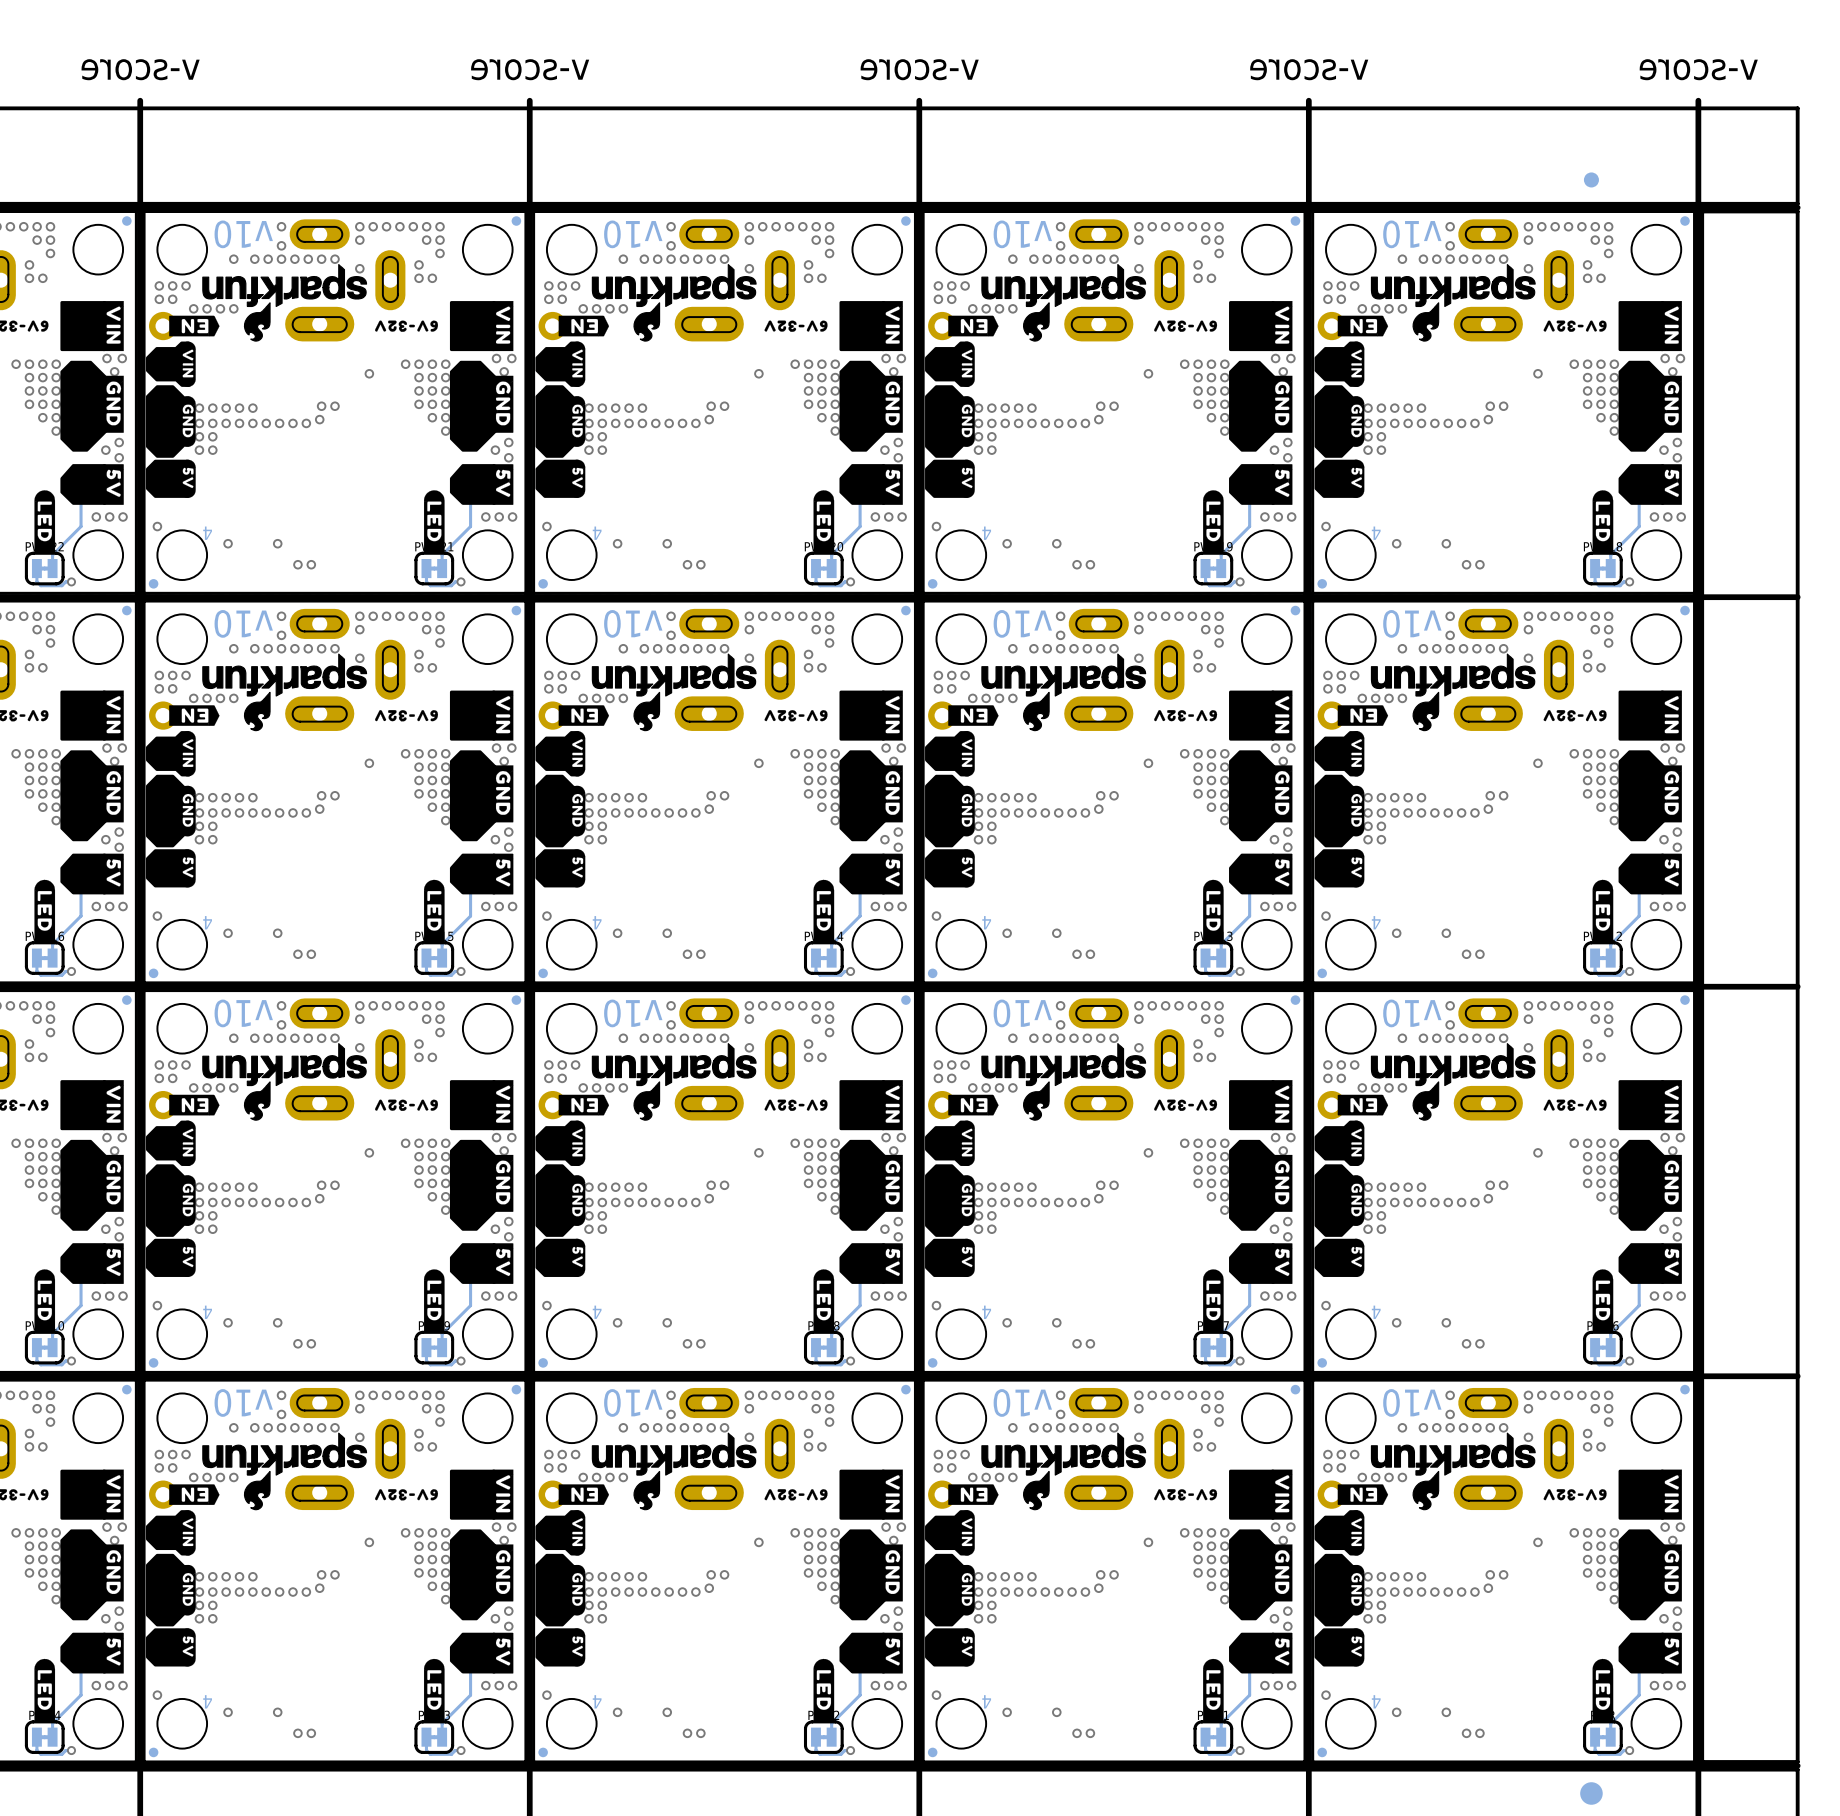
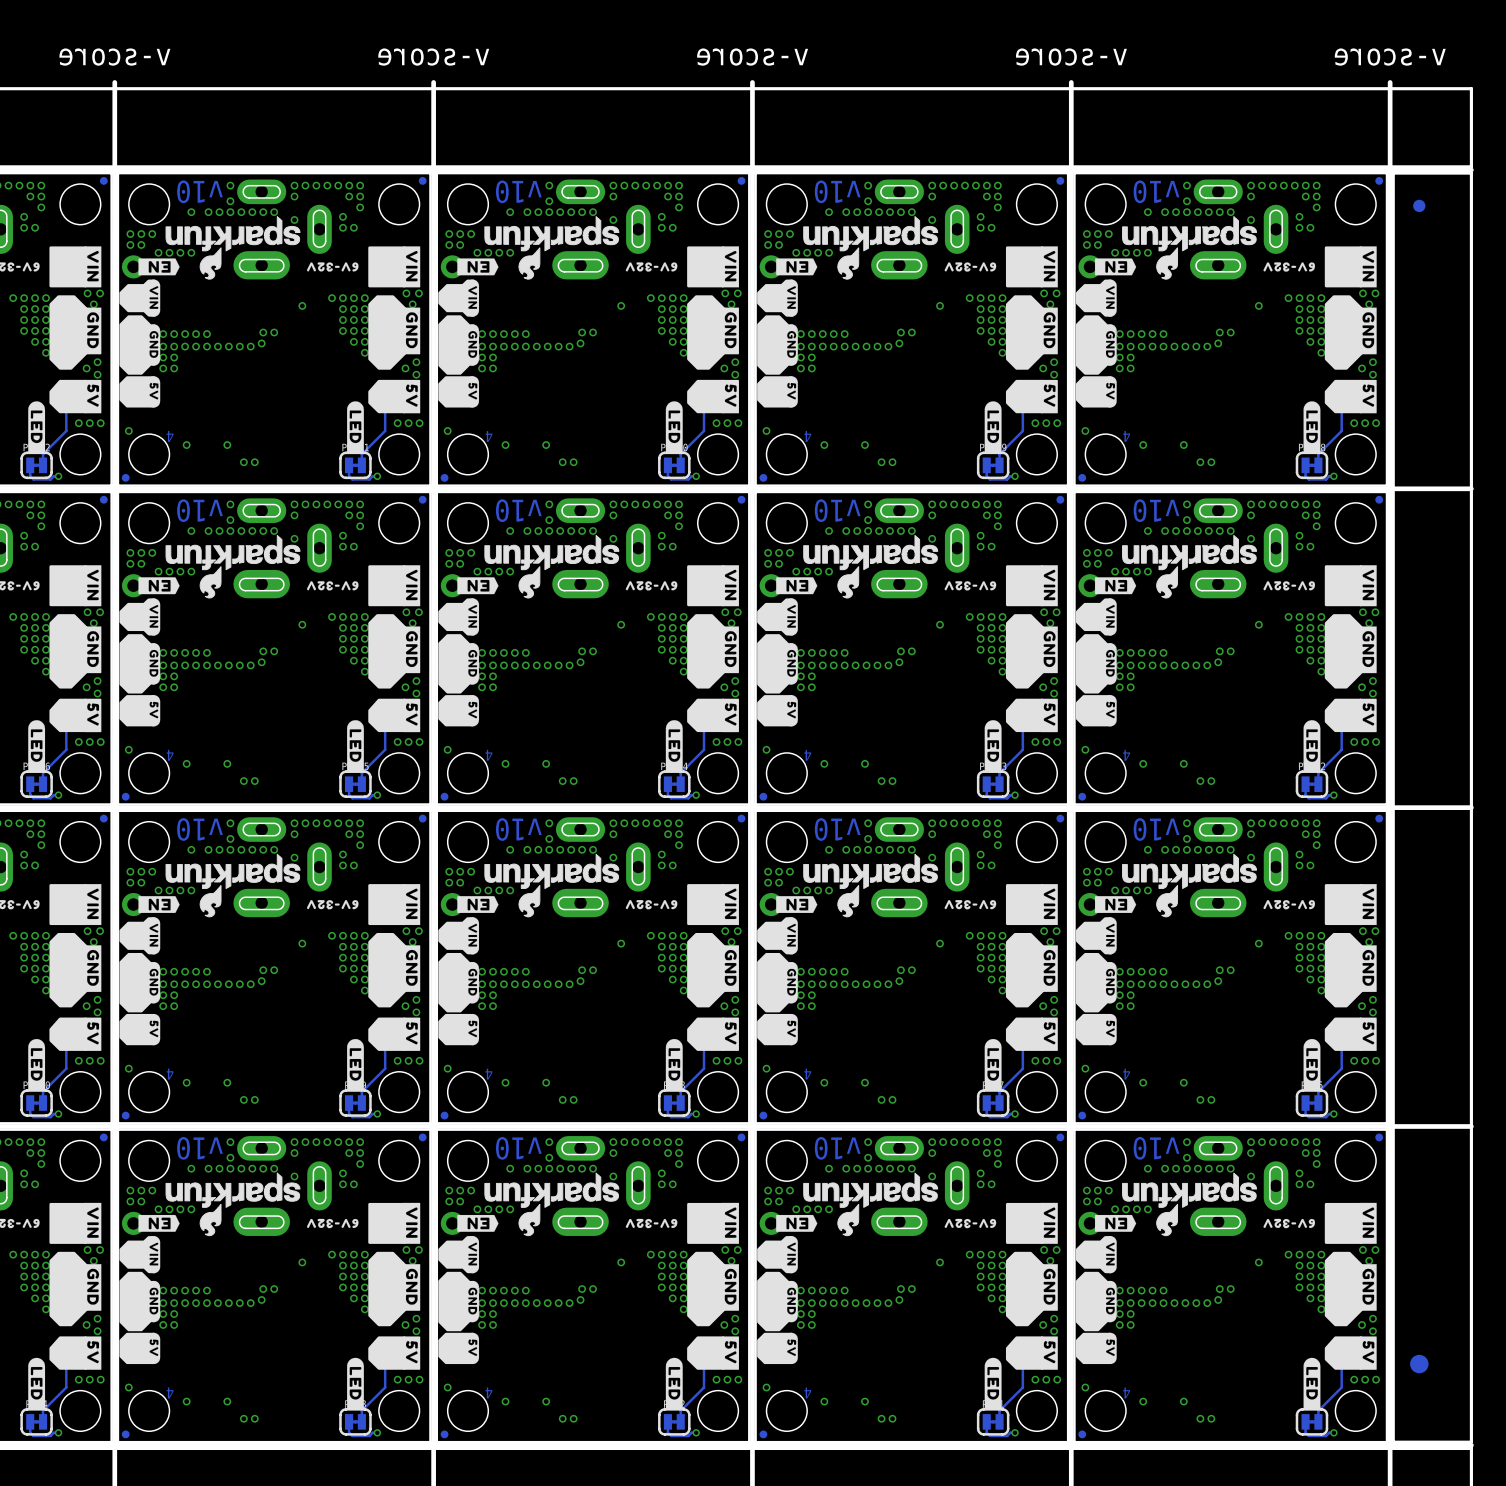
part position: (1591, 179) -> (1419, 205)
part position: (1591, 1793) -> (1419, 1364)

